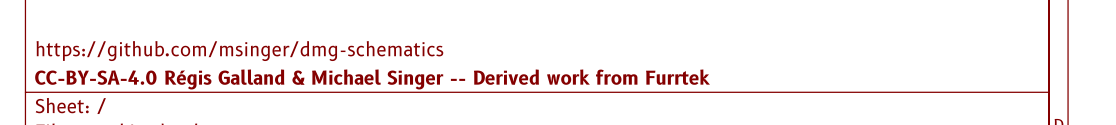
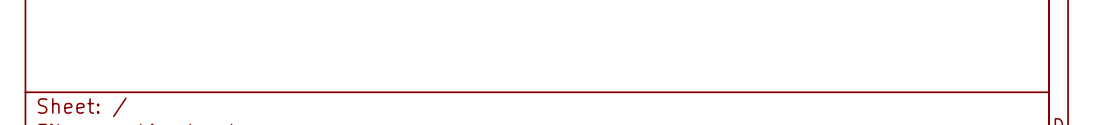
title block: https://github.com/msinger/dmg-schematics (239, 51) -> none
title block: CC-BY-SA-4.0 Régis Galland & Michael Singer -- Derived work from Furrtek (372, 79) -> none

